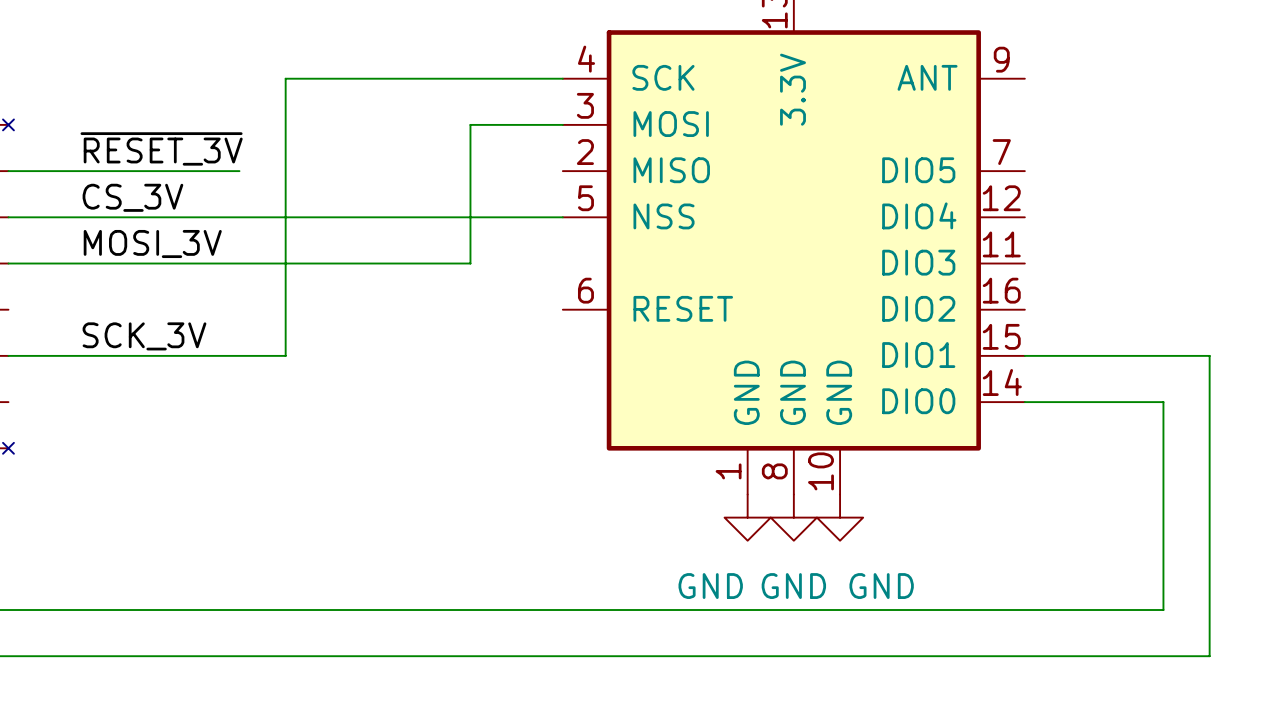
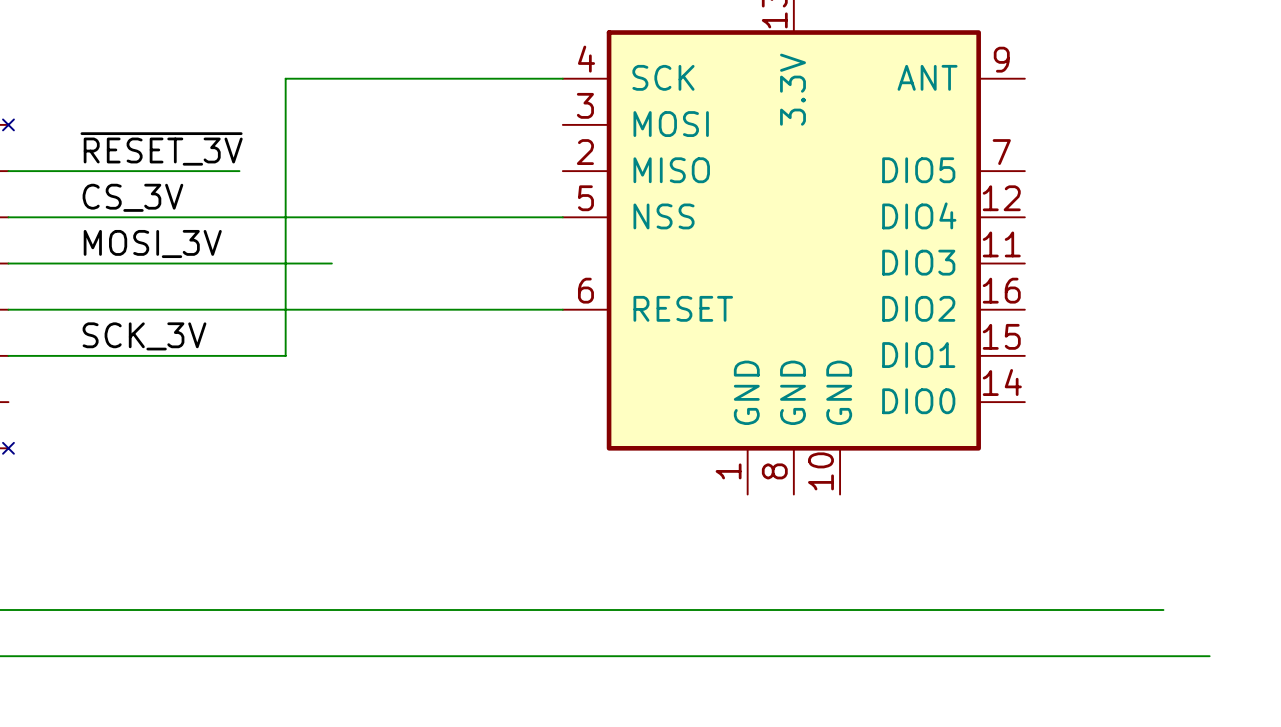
wire: (562, 124) (470, 124) (470, 263) (331, 263) -> none
wire: none -> (8, 309) (562, 309)
wire: (1024, 355) (1209, 355) (1209, 656) -> none
wire: (1024, 402) (1163, 402) (1163, 610) -> none
power symbol: GND (747, 517) -> none
power symbol: GND (793, 517) -> none
power symbol: GND (840, 517) -> none

